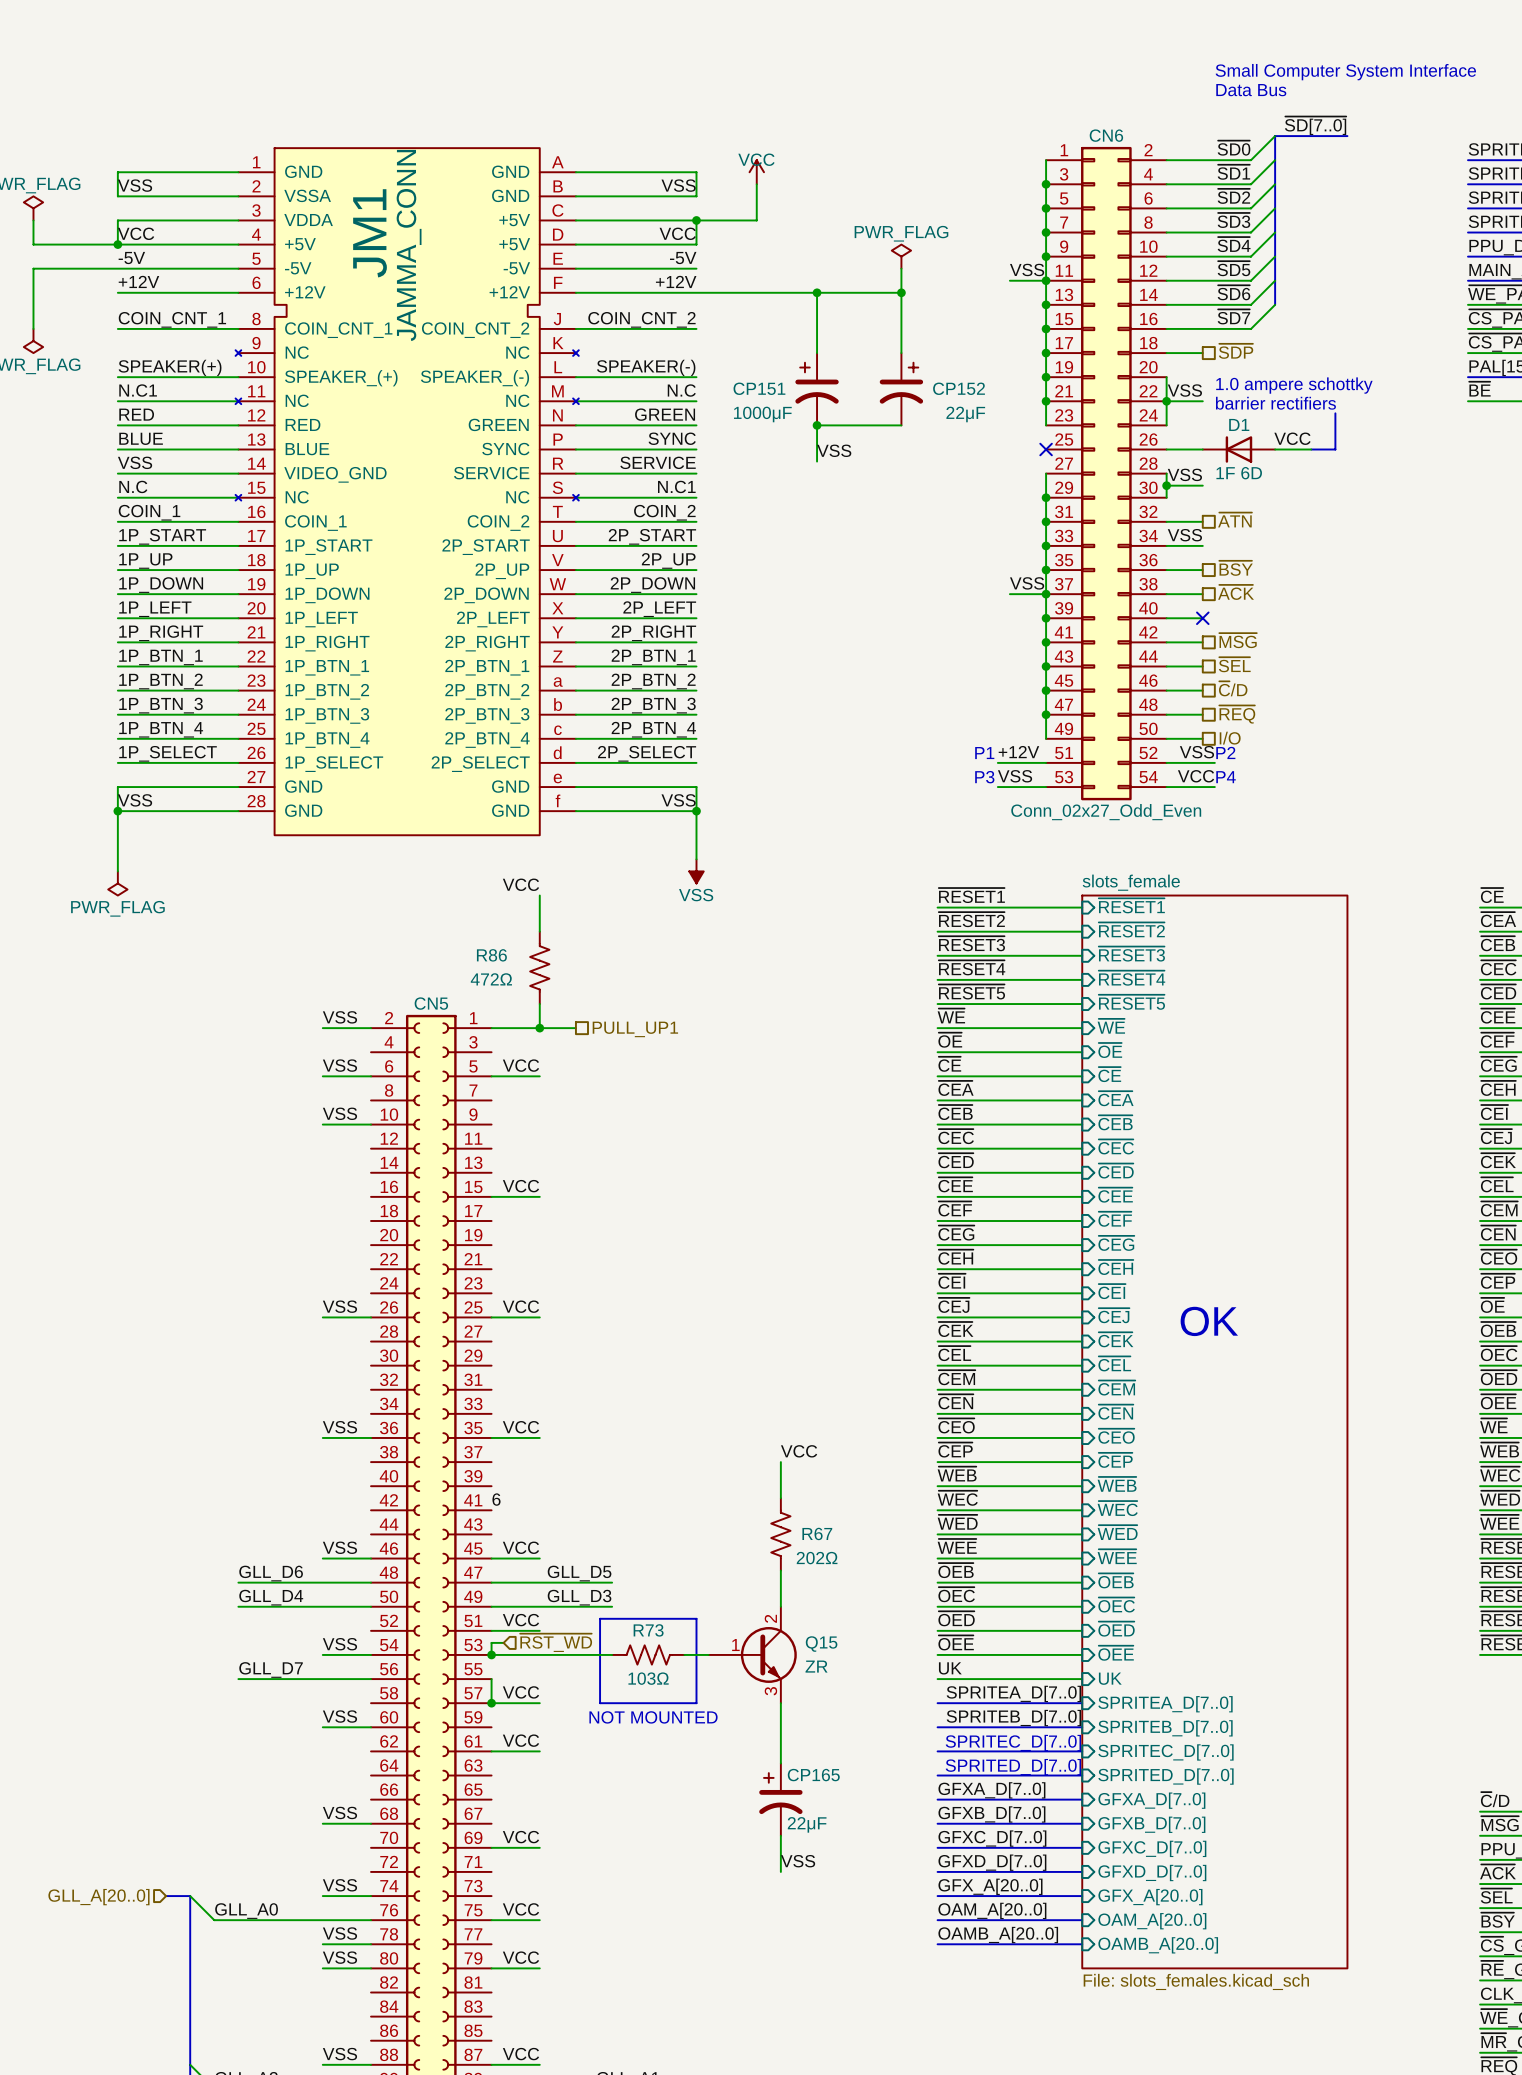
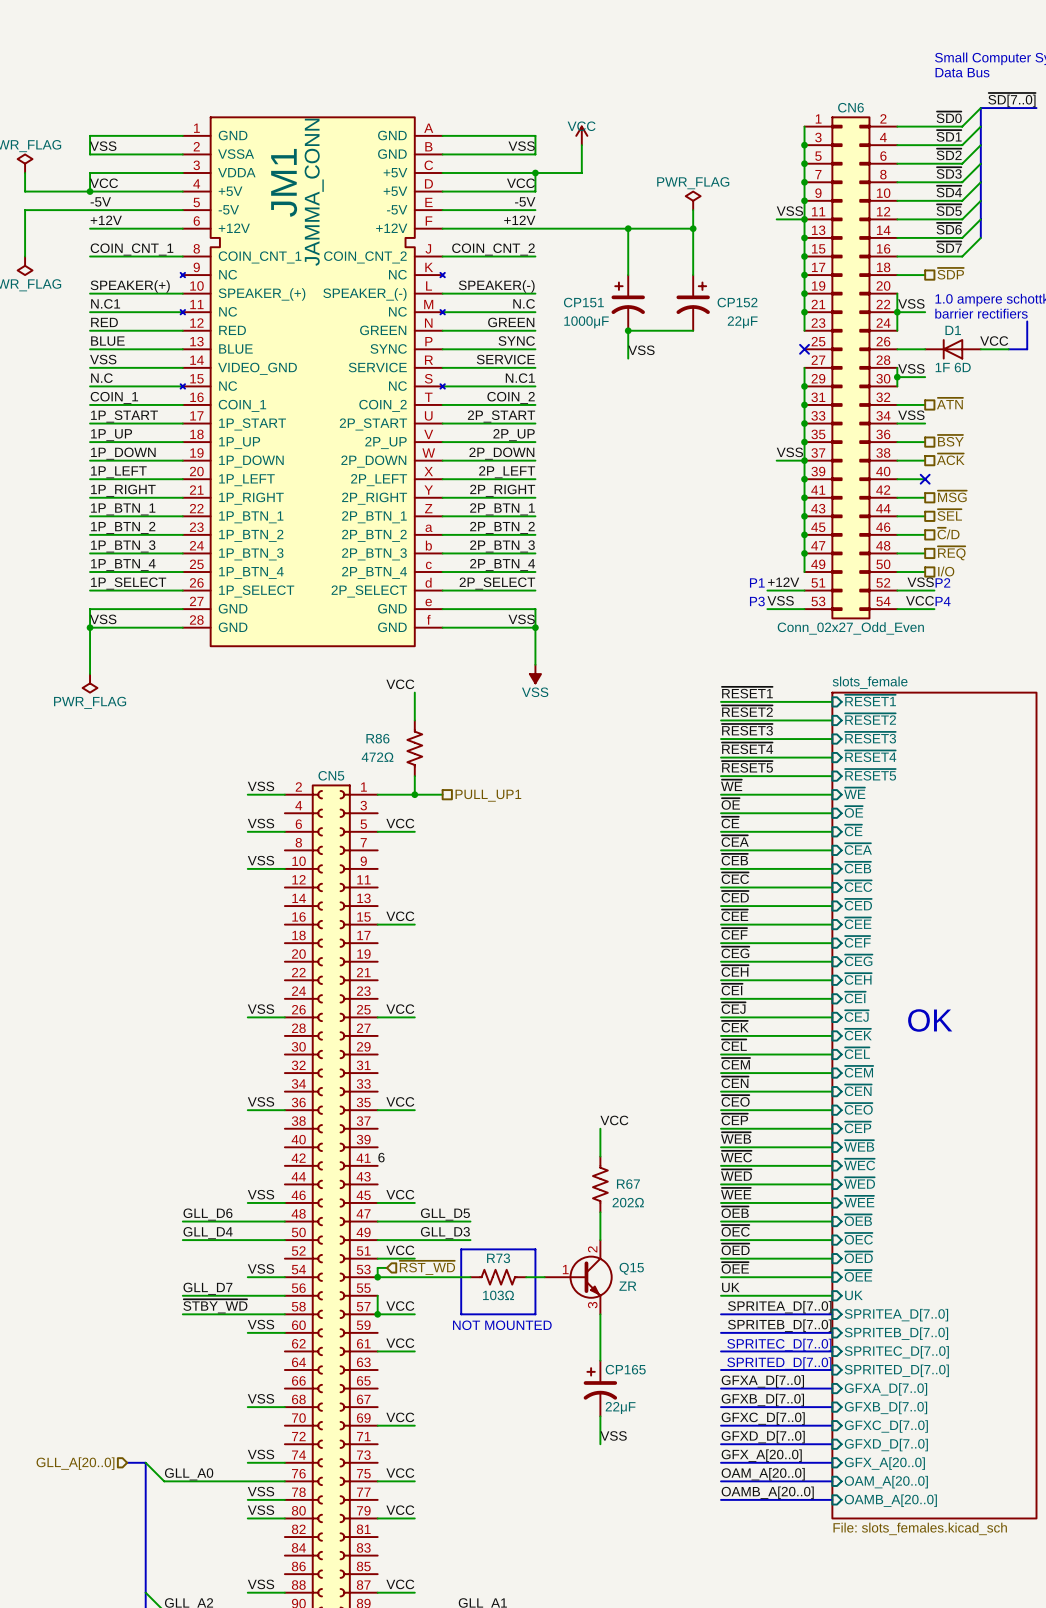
label: none -> ~{STBY_WD} (215, 1306)
wire: none -> (182, 1314) (284, 1314)

